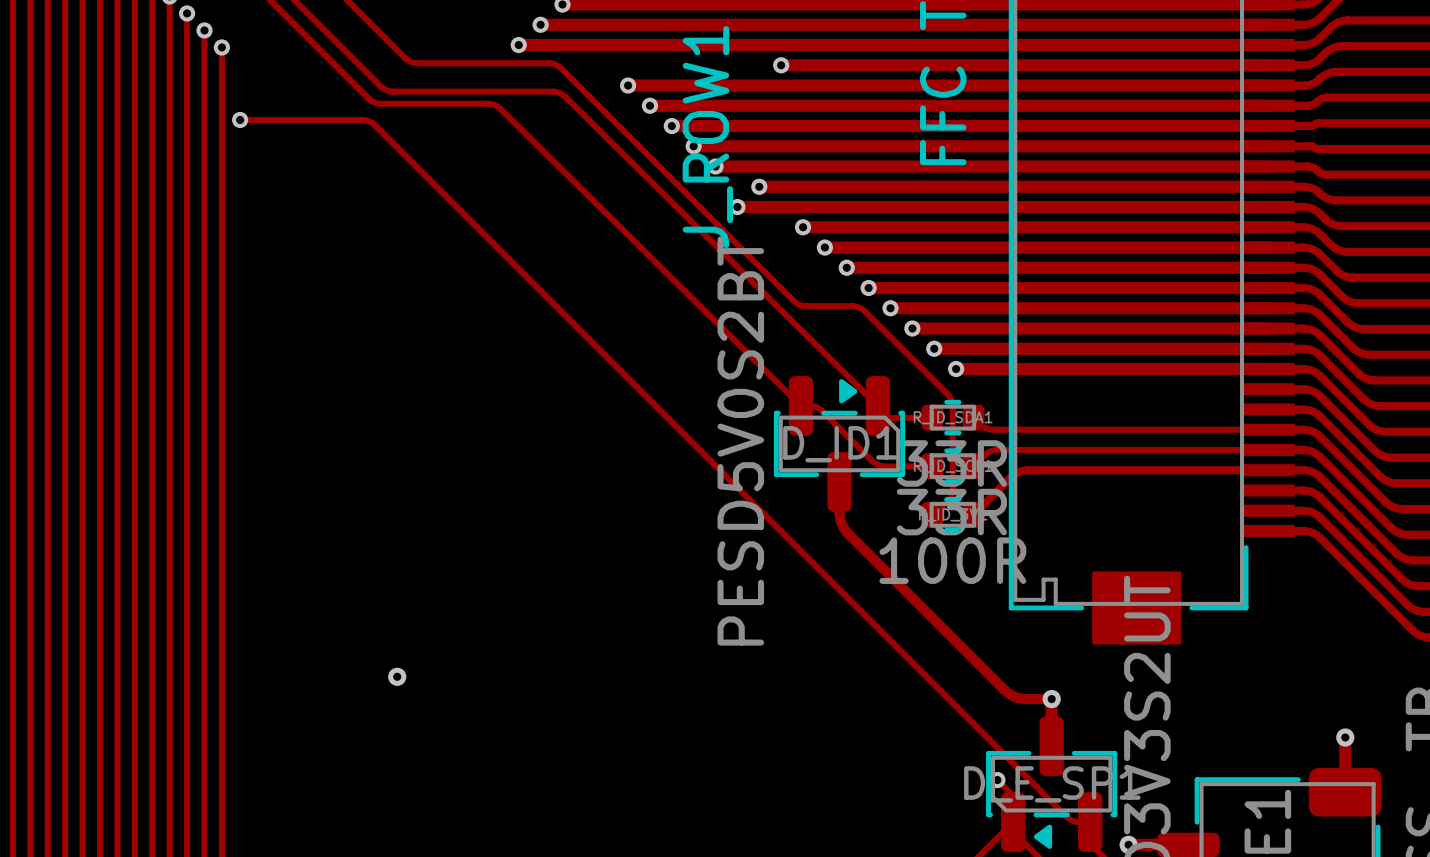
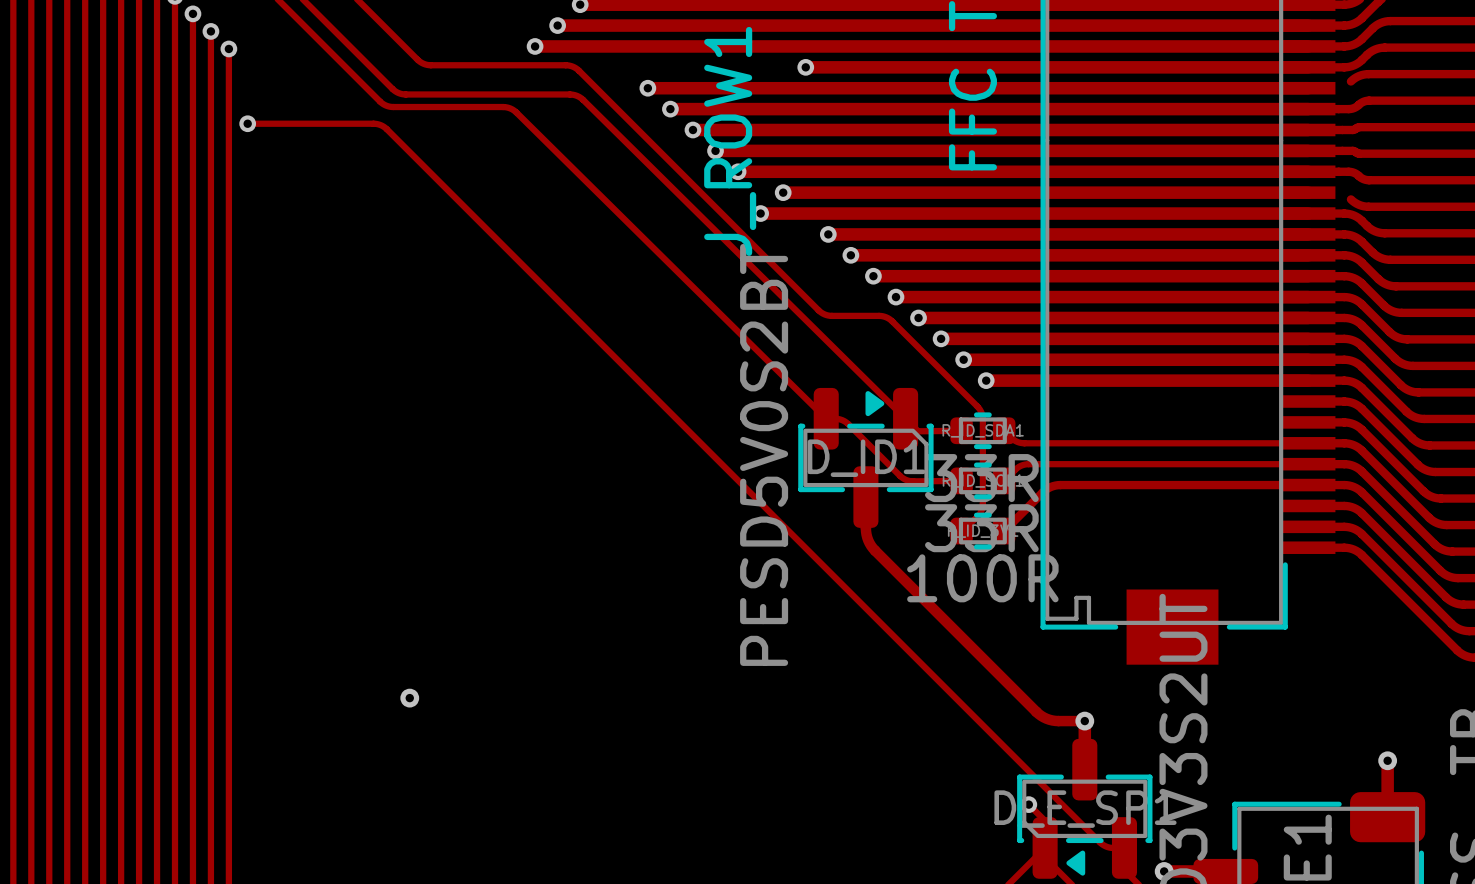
track: (1336, 71) (1325, 74) (1310, 84) (1294, 85) -> (1378, 74) (1361, 75) (1350, 81)
track: (1294, 186) (1309, 187) (1327, 198) (1336, 200) -> (1350, 199) (1361, 205) (1378, 206)

